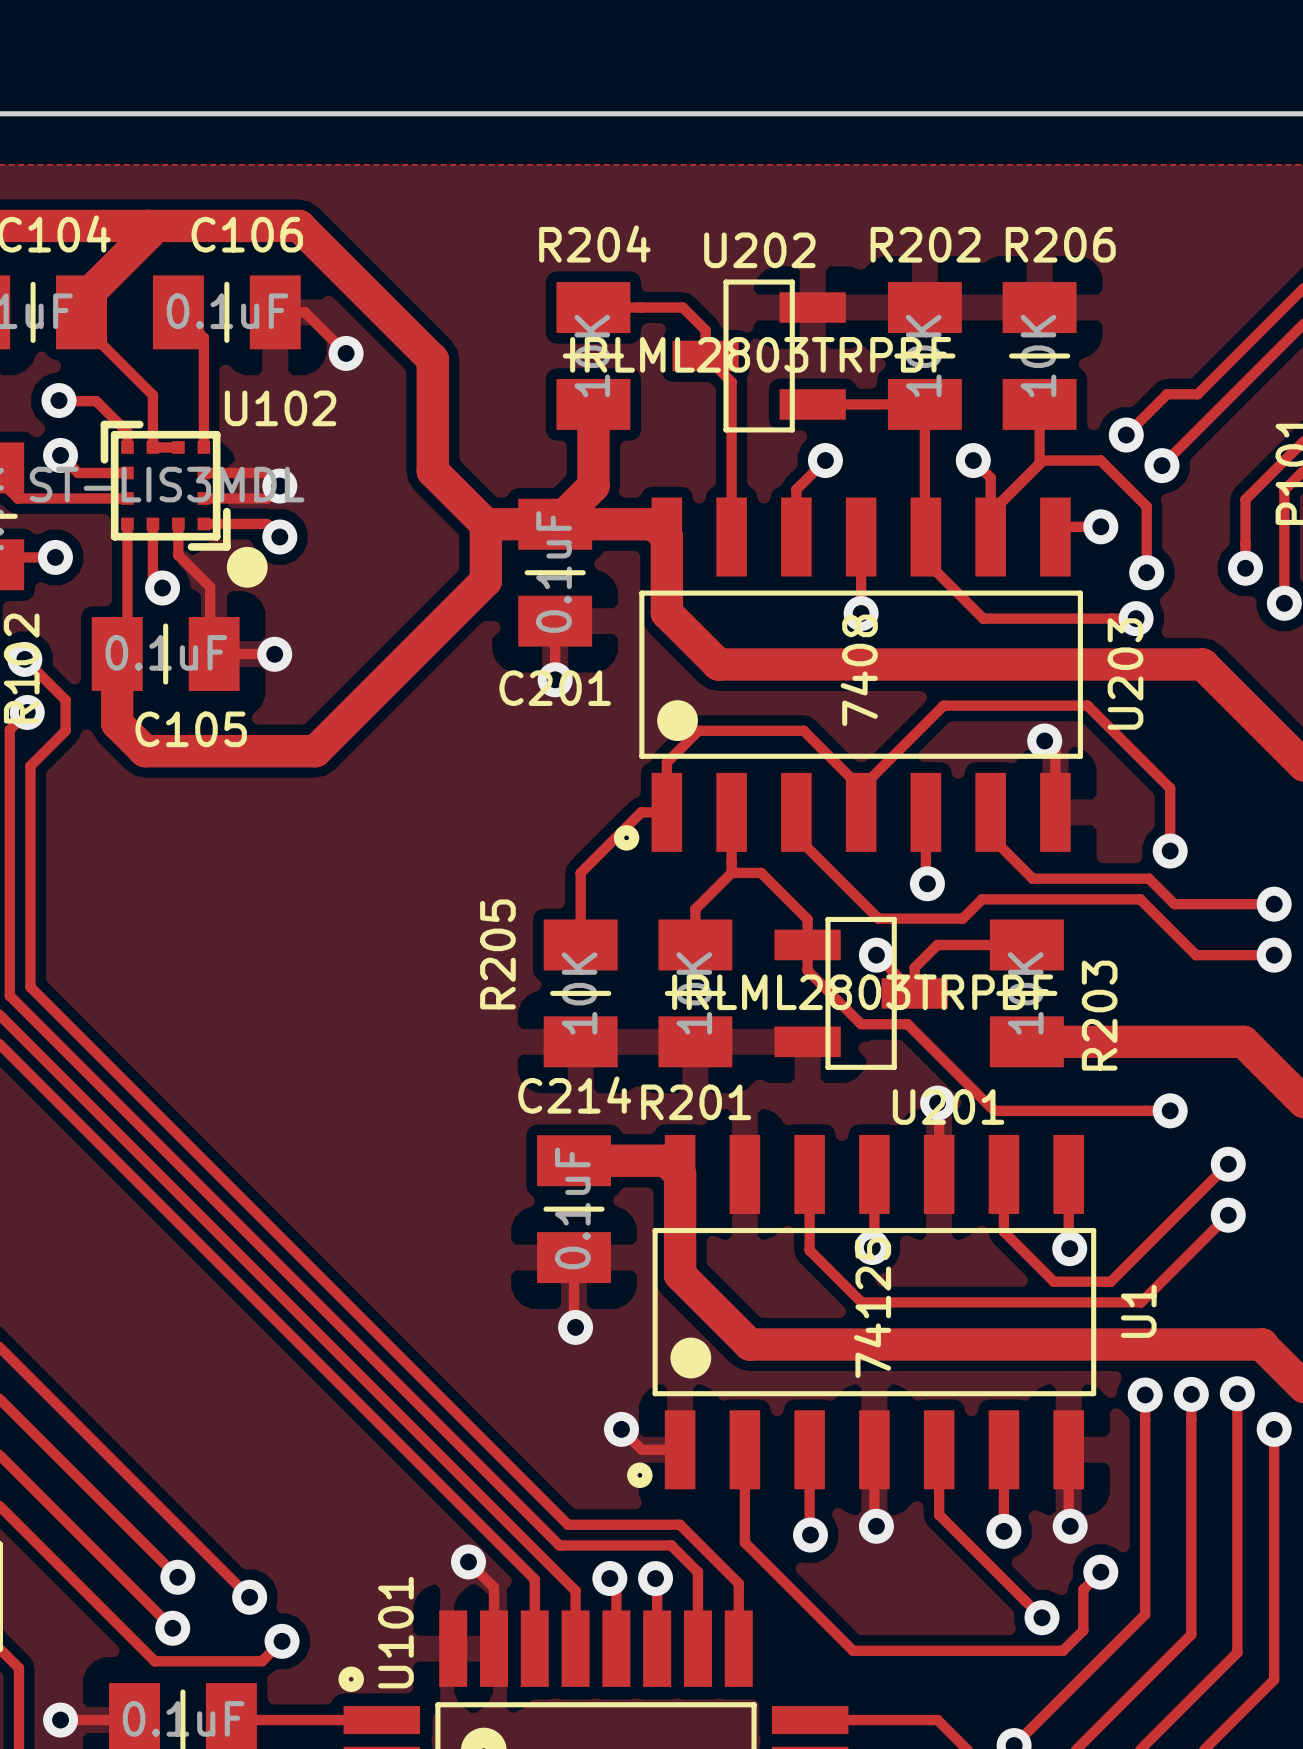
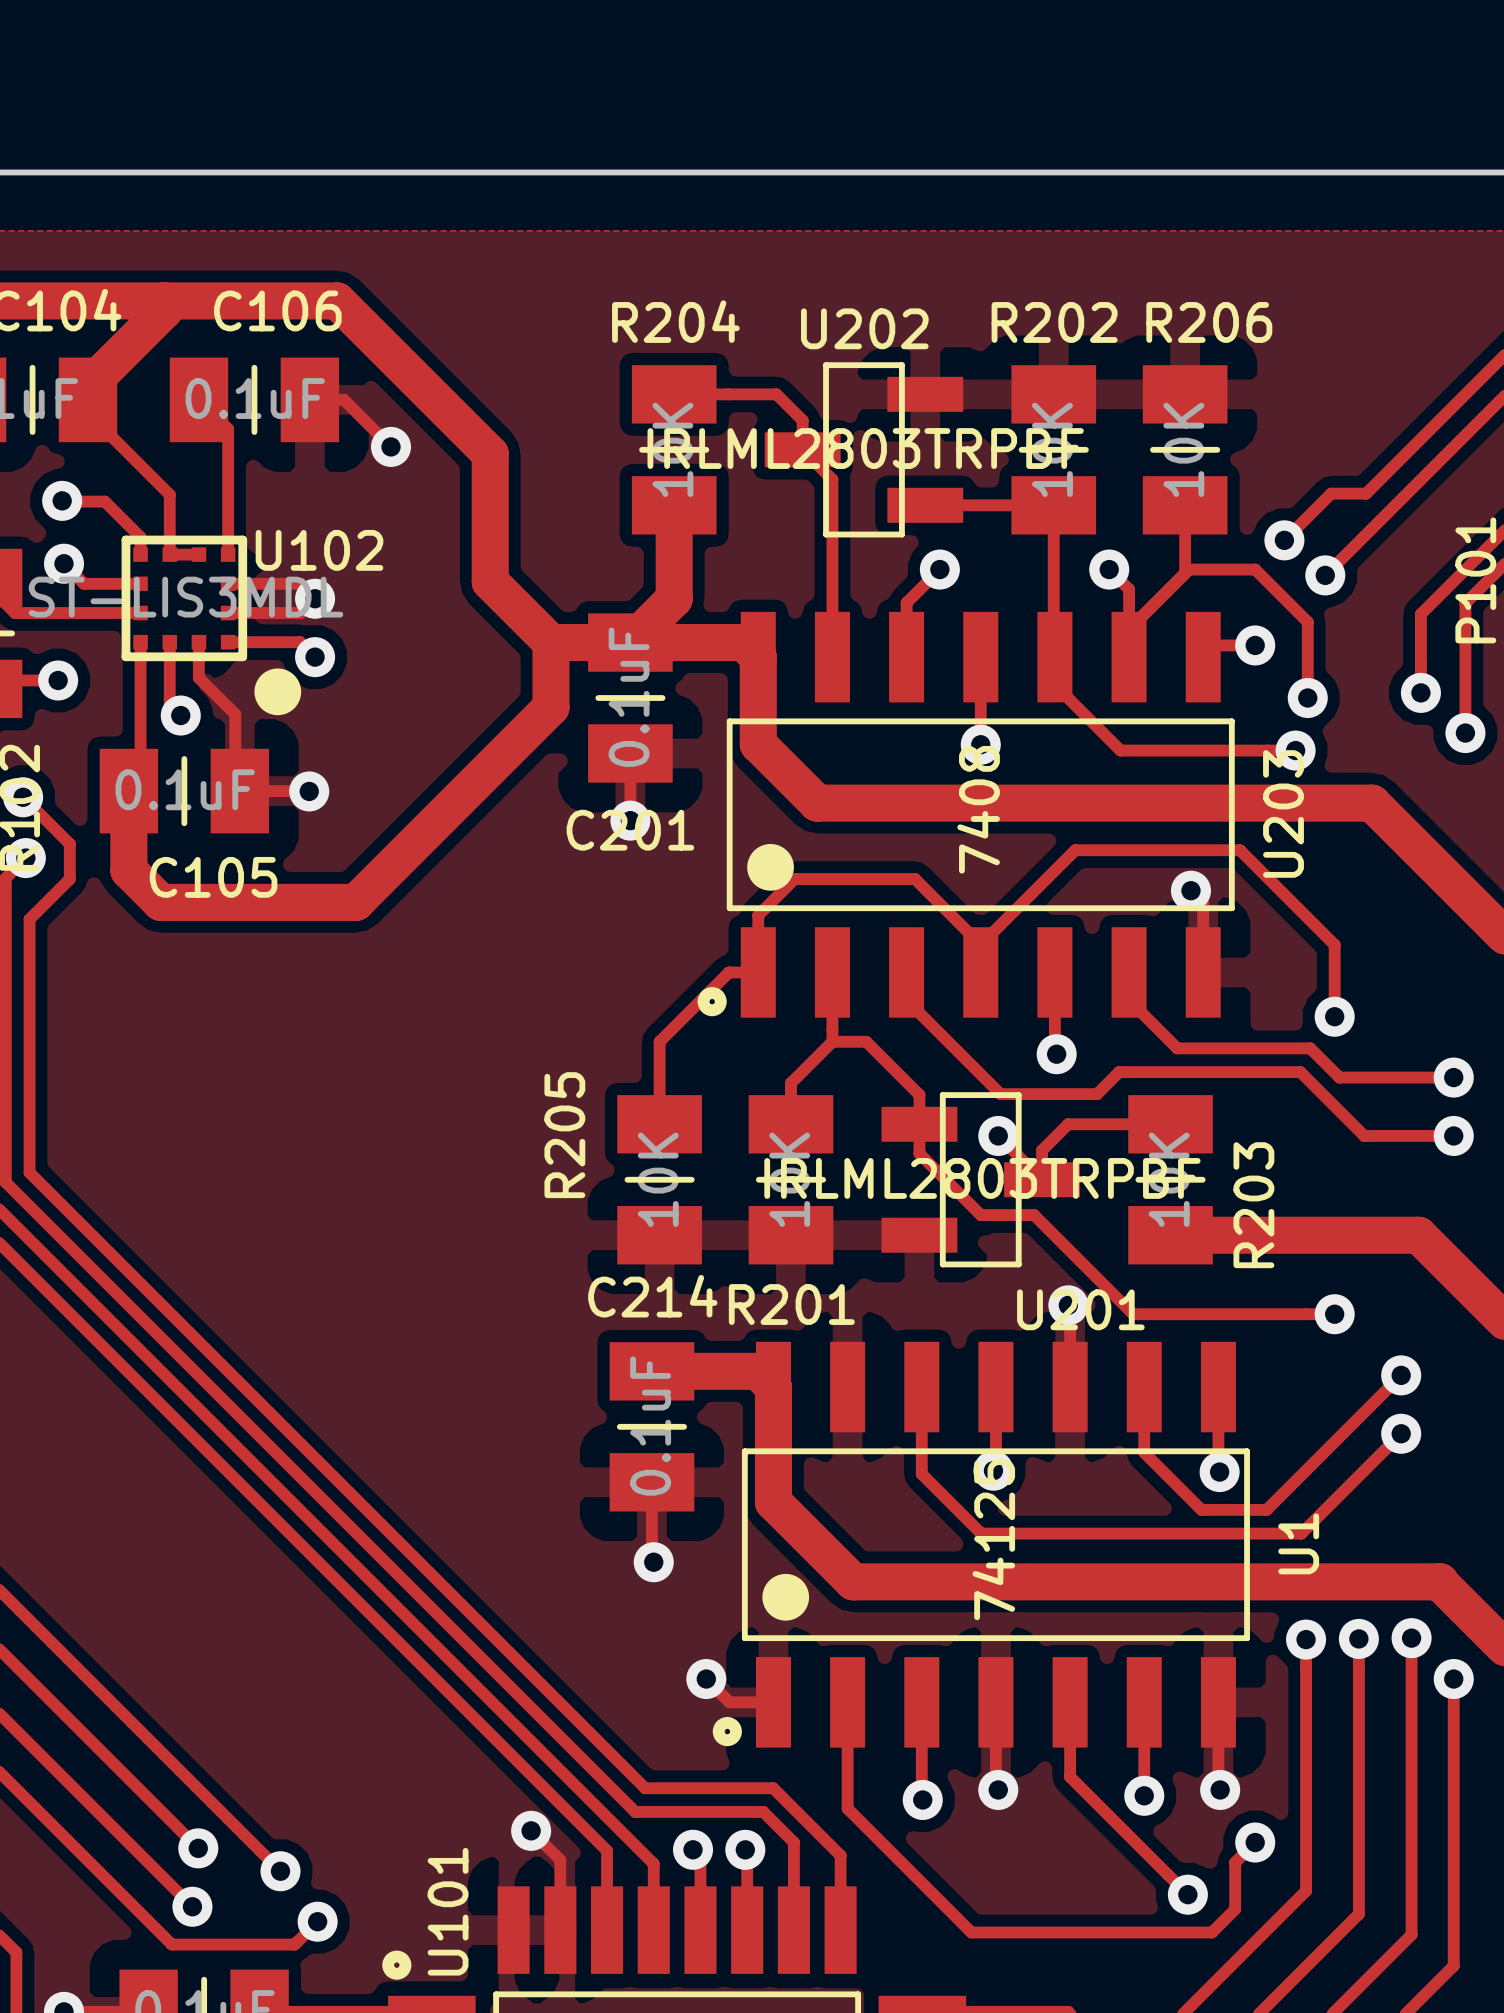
U102 name position: U102 (280, 408) -> U102 (319, 550)
U102 footprint: [100, 420, 268, 588] -> [121, 535, 302, 716]

